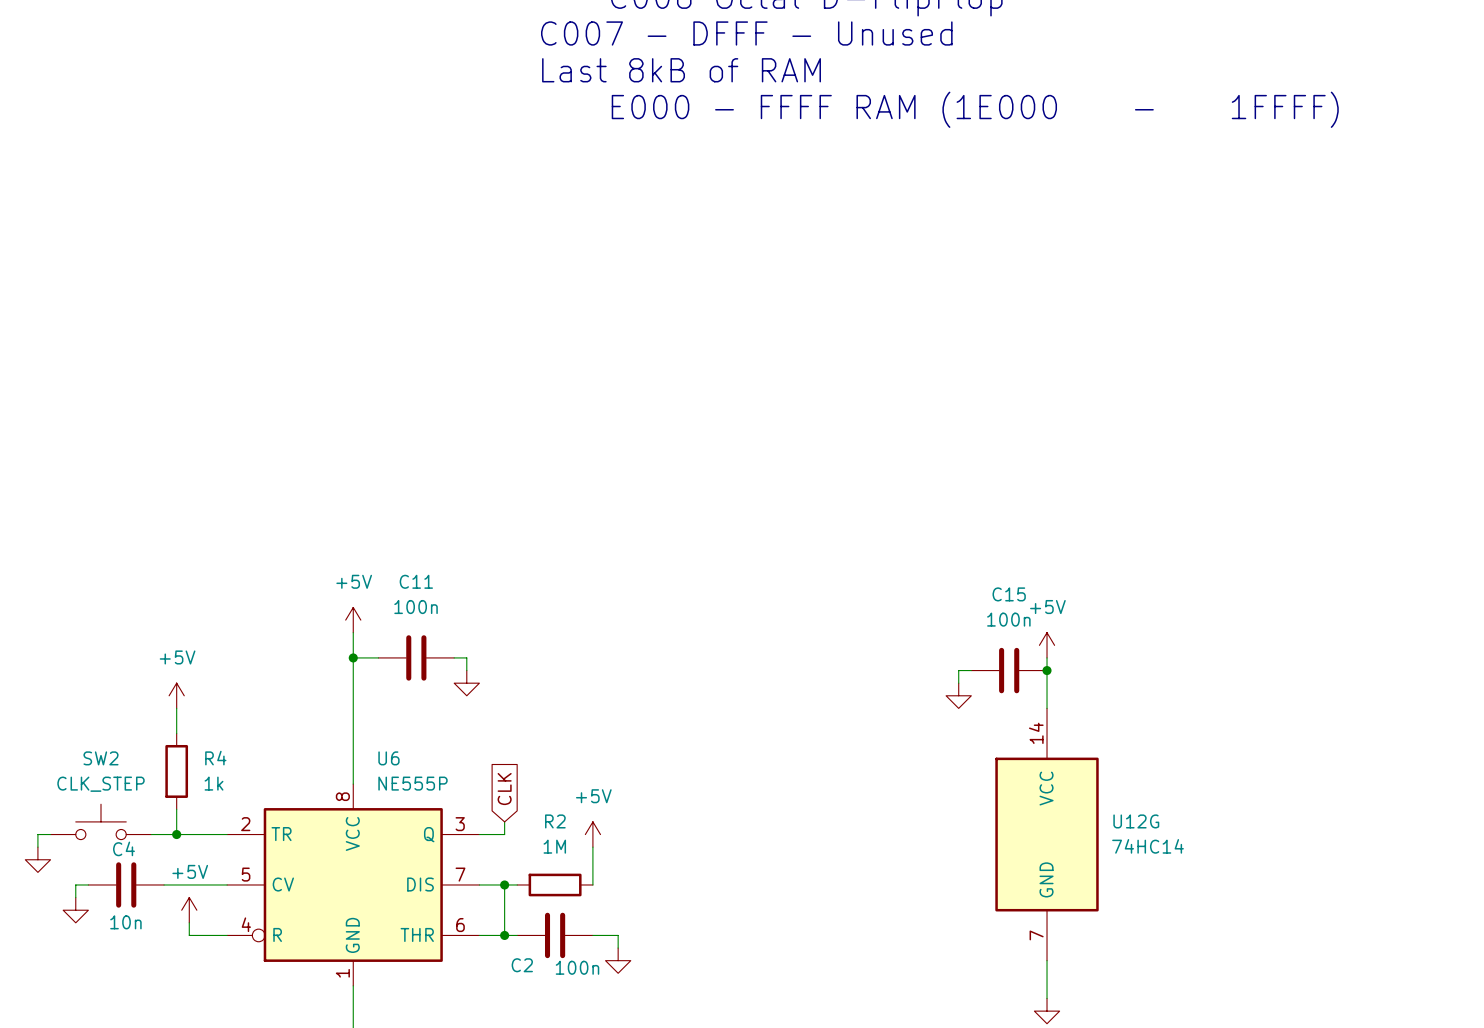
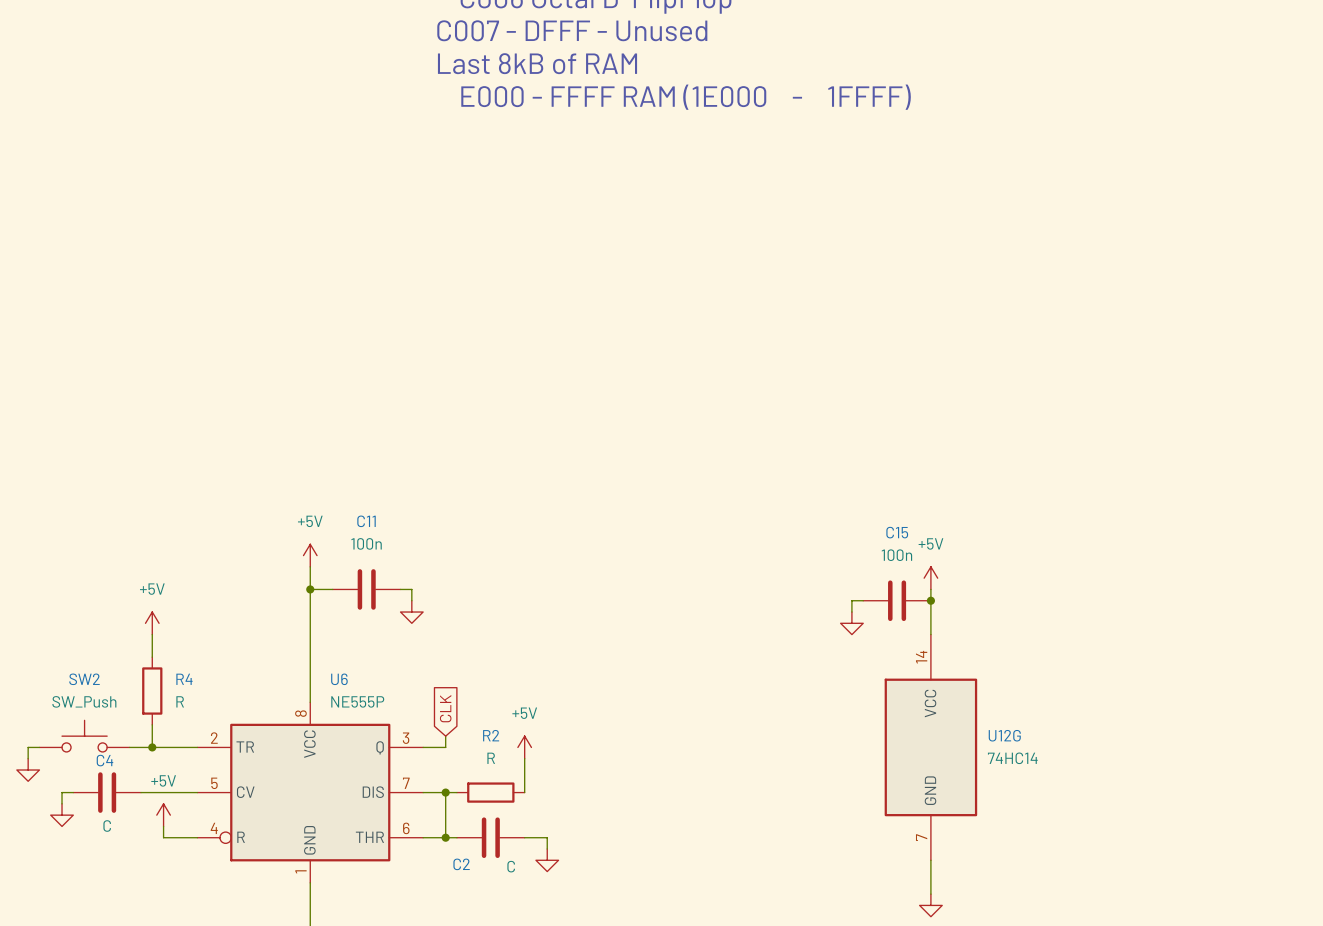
R4 value: 1k (214, 783) -> R (180, 701)
SW2 value: CLK_STEP (101, 784) -> SW_Push (84, 701)
R2 value: 1M (554, 846) -> R (491, 758)
C4 value: 10n (125, 922) -> C (107, 826)
C2 value: 100n (577, 967) -> C (511, 866)

